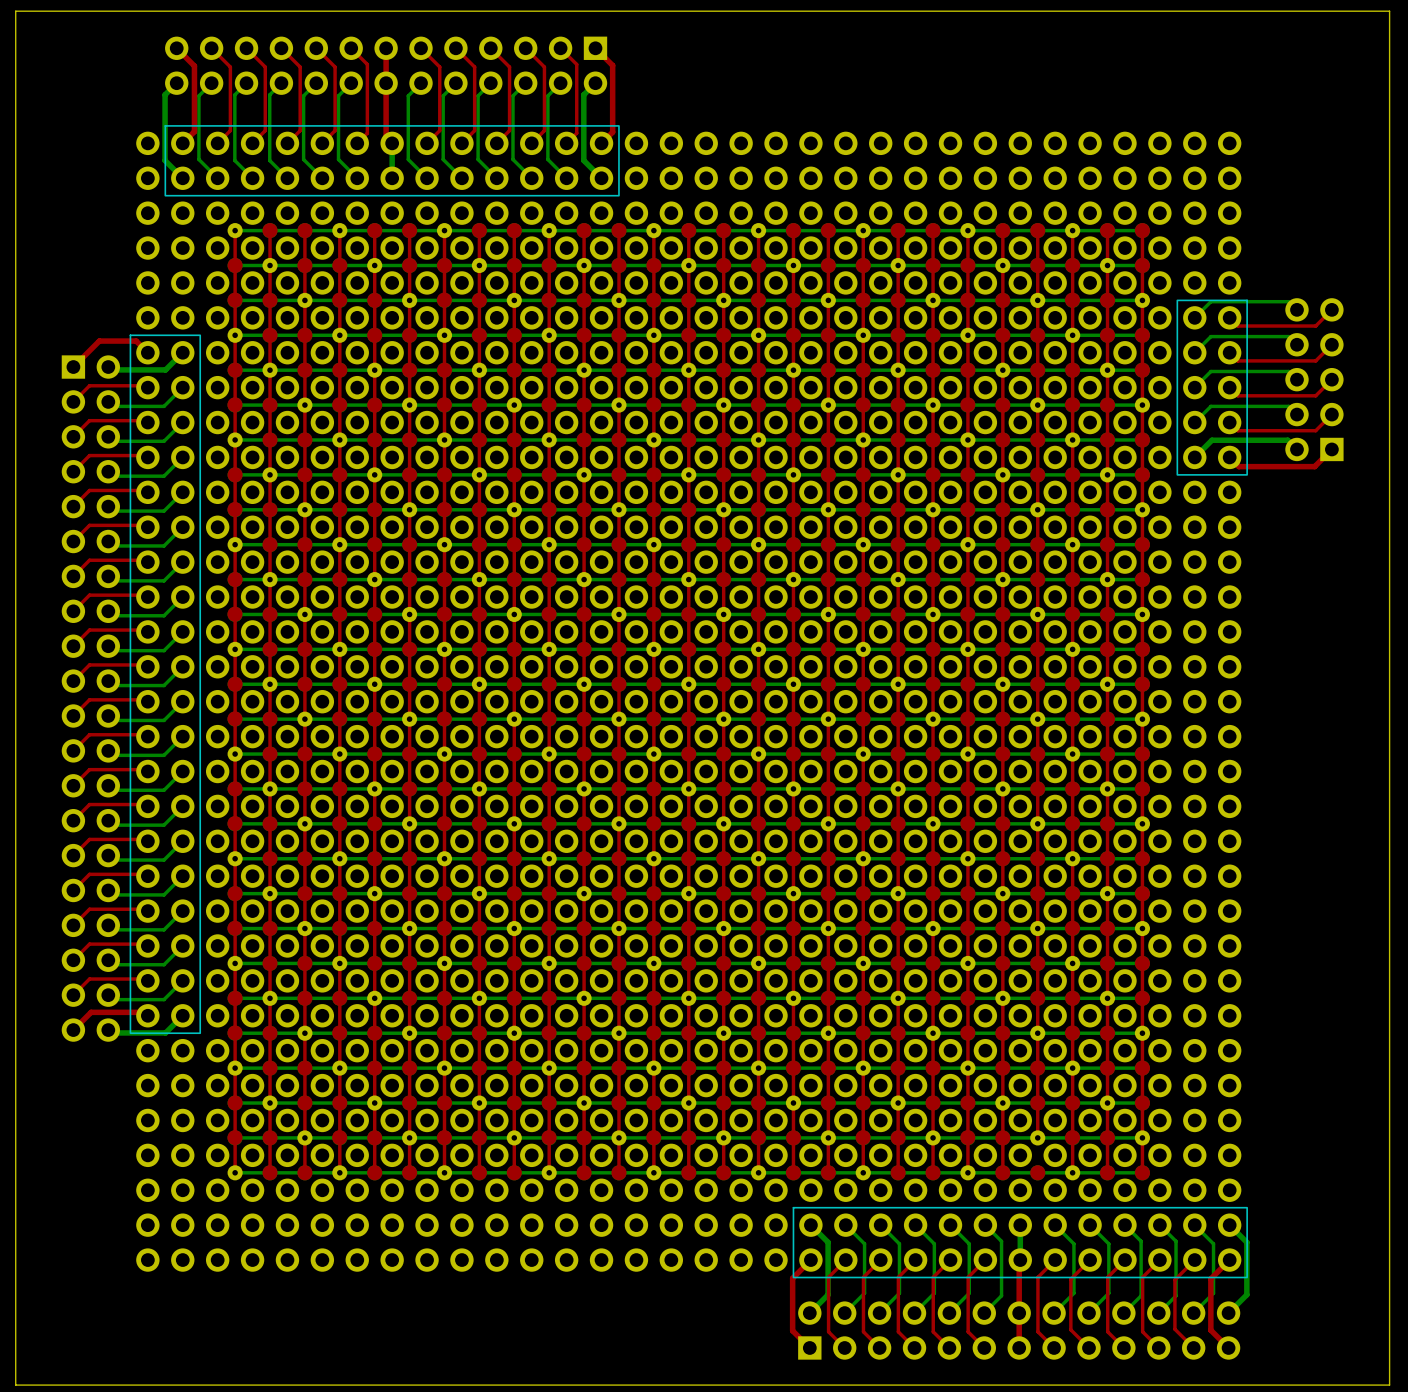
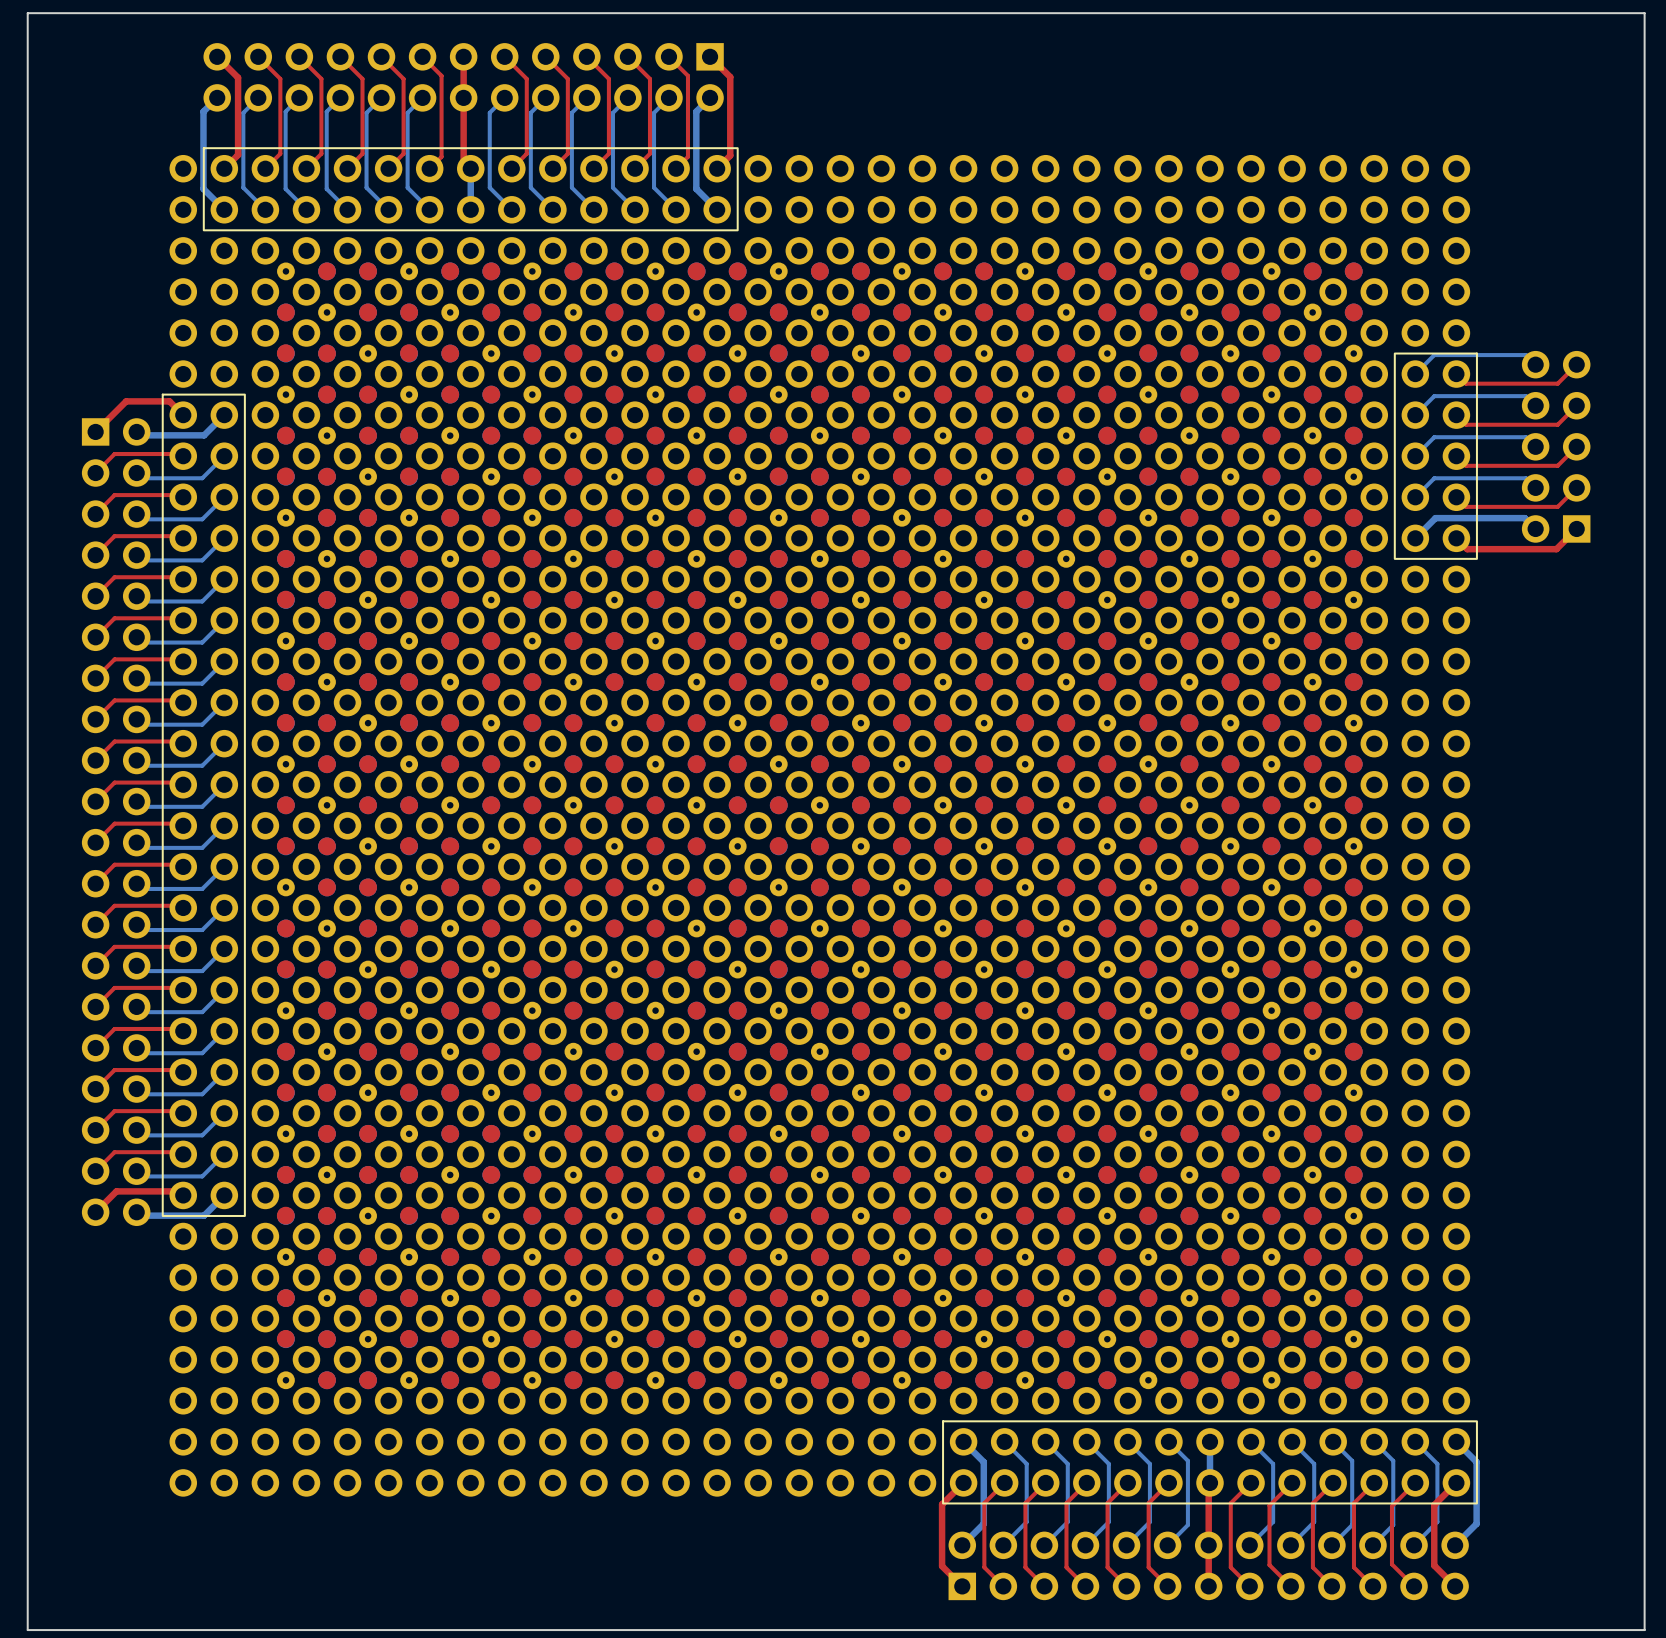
top track: (235, 230) (235, 1172) -> none
bottom track: (235, 230) (1142, 230) -> none
top track: (270, 230) (270, 1172) -> none
top track: (304, 230) (304, 1172) -> none
top track: (339, 230) (339, 1172) -> none
top track: (374, 230) (374, 1172) -> none
top track: (409, 230) (409, 1172) -> none
top track: (444, 230) (444, 1172) -> none
top track: (479, 230) (479, 1172) -> none
top track: (514, 230) (514, 1172) -> none
top track: (549, 230) (549, 1172) -> none
top track: (584, 230) (584, 1172) -> none
top track: (618, 230) (618, 1172) -> none
top track: (653, 230) (653, 1172) -> none
top track: (688, 230) (688, 1172) -> none
top track: (723, 230) (723, 1172) -> none
top track: (758, 230) (758, 1172) -> none
top track: (793, 230) (793, 1172) -> none
top track: (828, 230) (828, 1172) -> none
top track: (863, 230) (863, 1172) -> none
top track: (898, 230) (898, 1172) -> none
top track: (933, 230) (933, 1172) -> none
top track: (967, 230) (967, 1172) -> none
top track: (1002, 230) (1002, 1172) -> none
top track: (1037, 230) (1037, 1137) -> none
top track: (1072, 230) (1072, 1172) -> none
top track: (1107, 230) (1107, 1172) -> none
top track: (1142, 230) (1142, 1172) -> none
bottom track: (235, 265) (1142, 265) -> none
bottom track: (235, 300) (1142, 300) -> none
bottom track: (235, 335) (1142, 335) -> none
bottom track: (235, 370) (1142, 370) -> none
bottom track: (235, 405) (1142, 405) -> none
bottom track: (235, 439) (1142, 439) -> none
bottom track: (235, 474) (1142, 474) -> none
bottom track: (235, 509) (1142, 509) -> none
bottom track: (235, 544) (1142, 544) -> none
bottom track: (235, 579) (1142, 579) -> none
bottom track: (235, 614) (1142, 614) -> none
bottom track: (235, 649) (1142, 649) -> none
bottom track: (235, 684) (1142, 684) -> none
bottom track: (235, 719) (1142, 719) -> none
bottom track: (235, 754) (1142, 754) -> none
bottom track: (235, 788) (1142, 788) -> none
bottom track: (235, 823) (1142, 823) -> none
bottom track: (235, 858) (1142, 858) -> none
bottom track: (235, 893) (1142, 893) -> none
bottom track: (235, 928) (1142, 928) -> none
bottom track: (235, 963) (1142, 963) -> none
bottom track: (235, 998) (1142, 998) -> none
bottom track: (235, 1033) (1142, 1033) -> none
bottom track: (235, 1068) (1142, 1068) -> none
bottom track: (235, 1103) (1142, 1103) -> none
bottom track: (235, 1137) (1142, 1137) -> none
bottom track: (235, 1172) (1142, 1172) -> none

